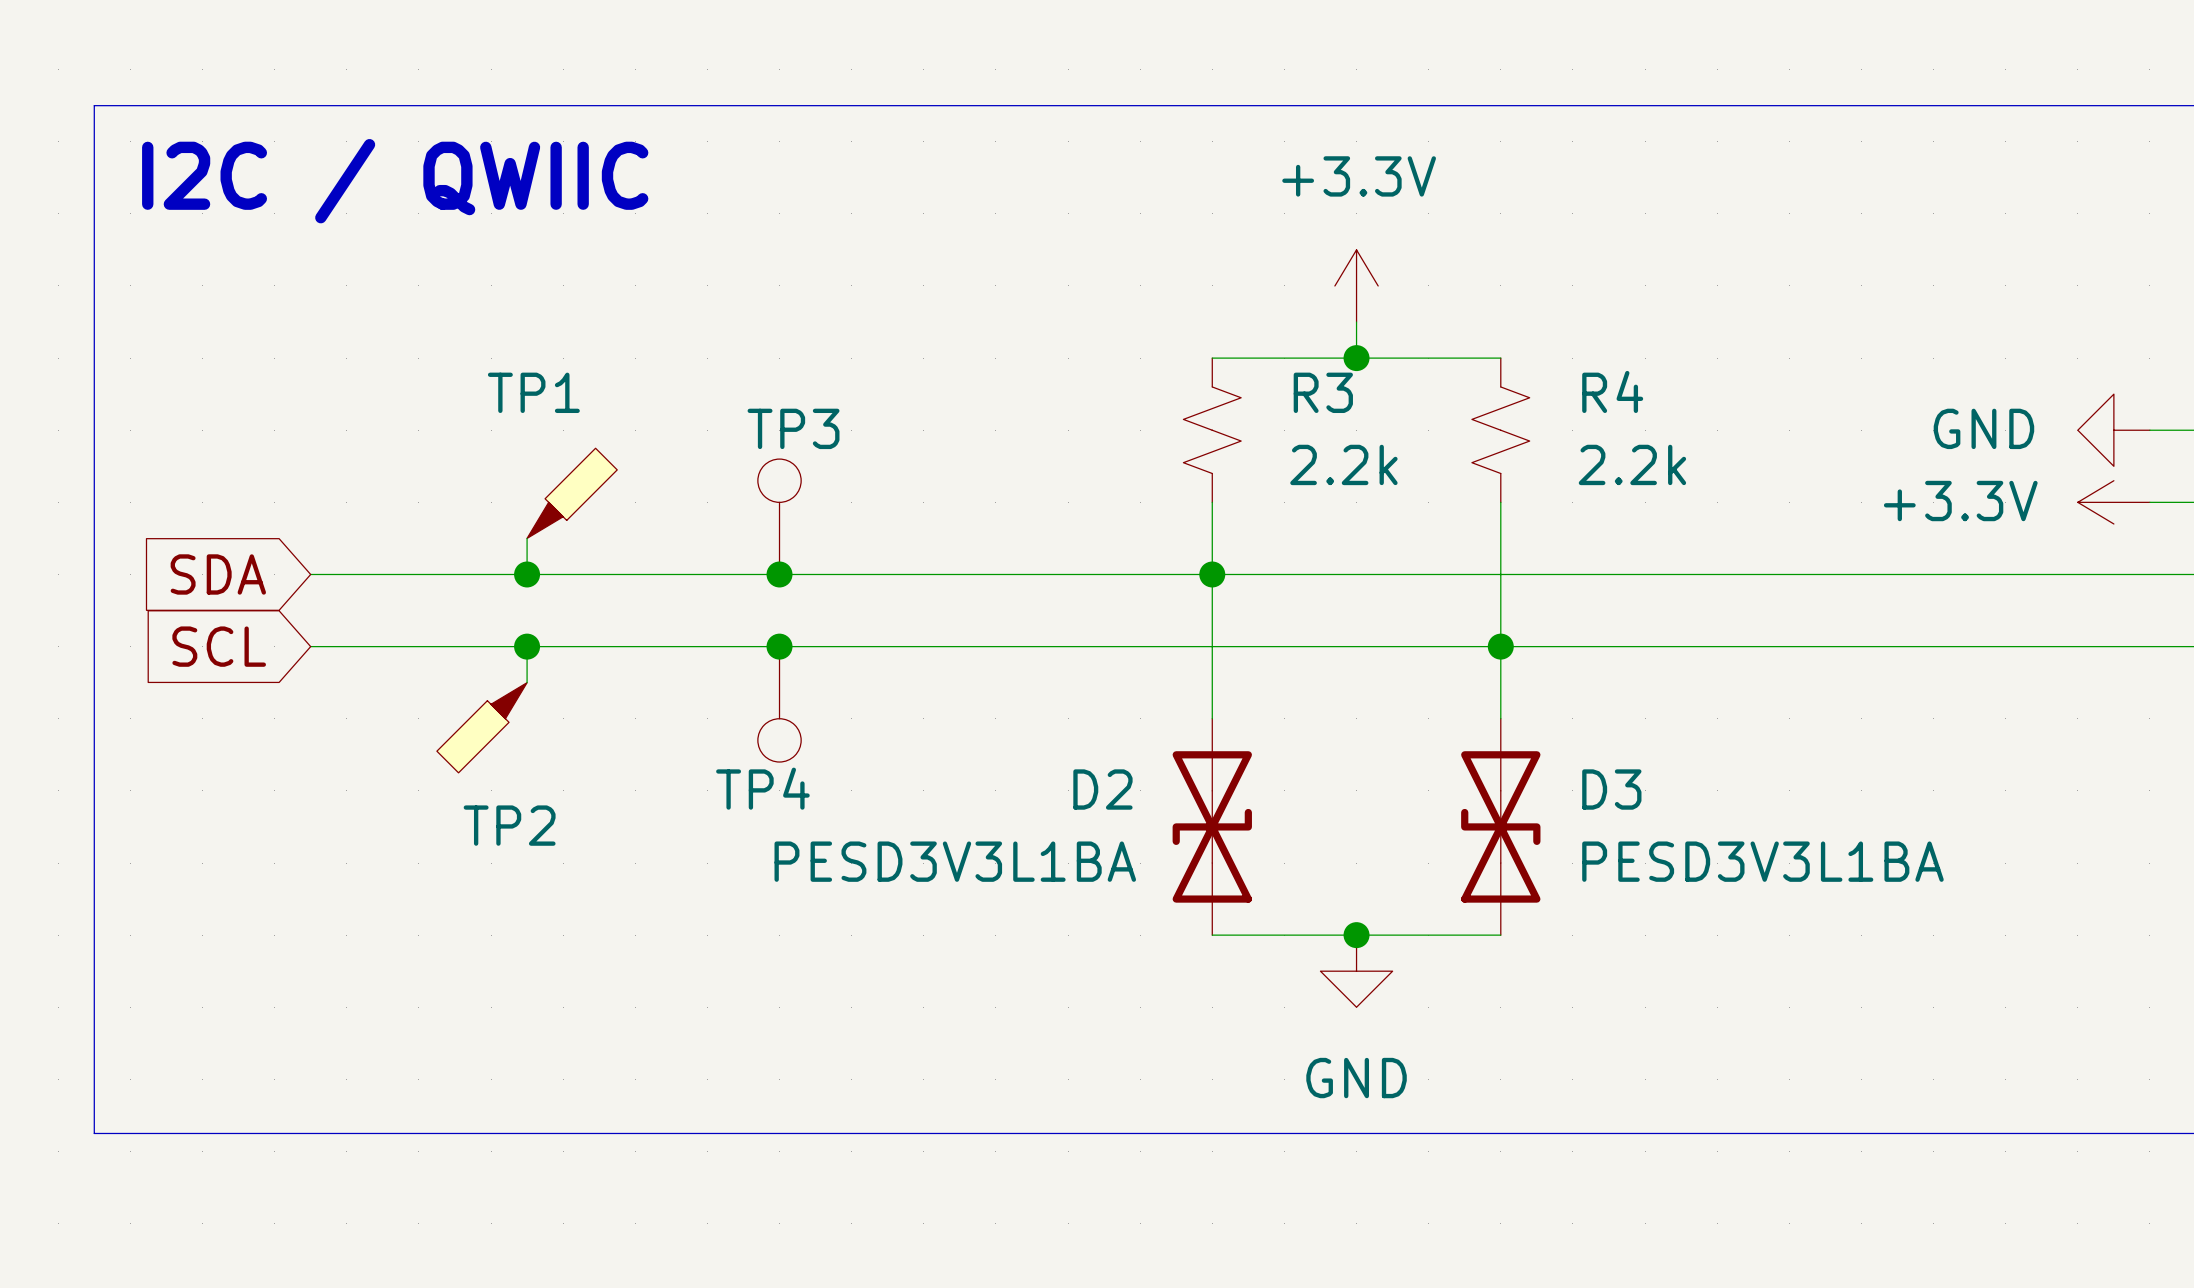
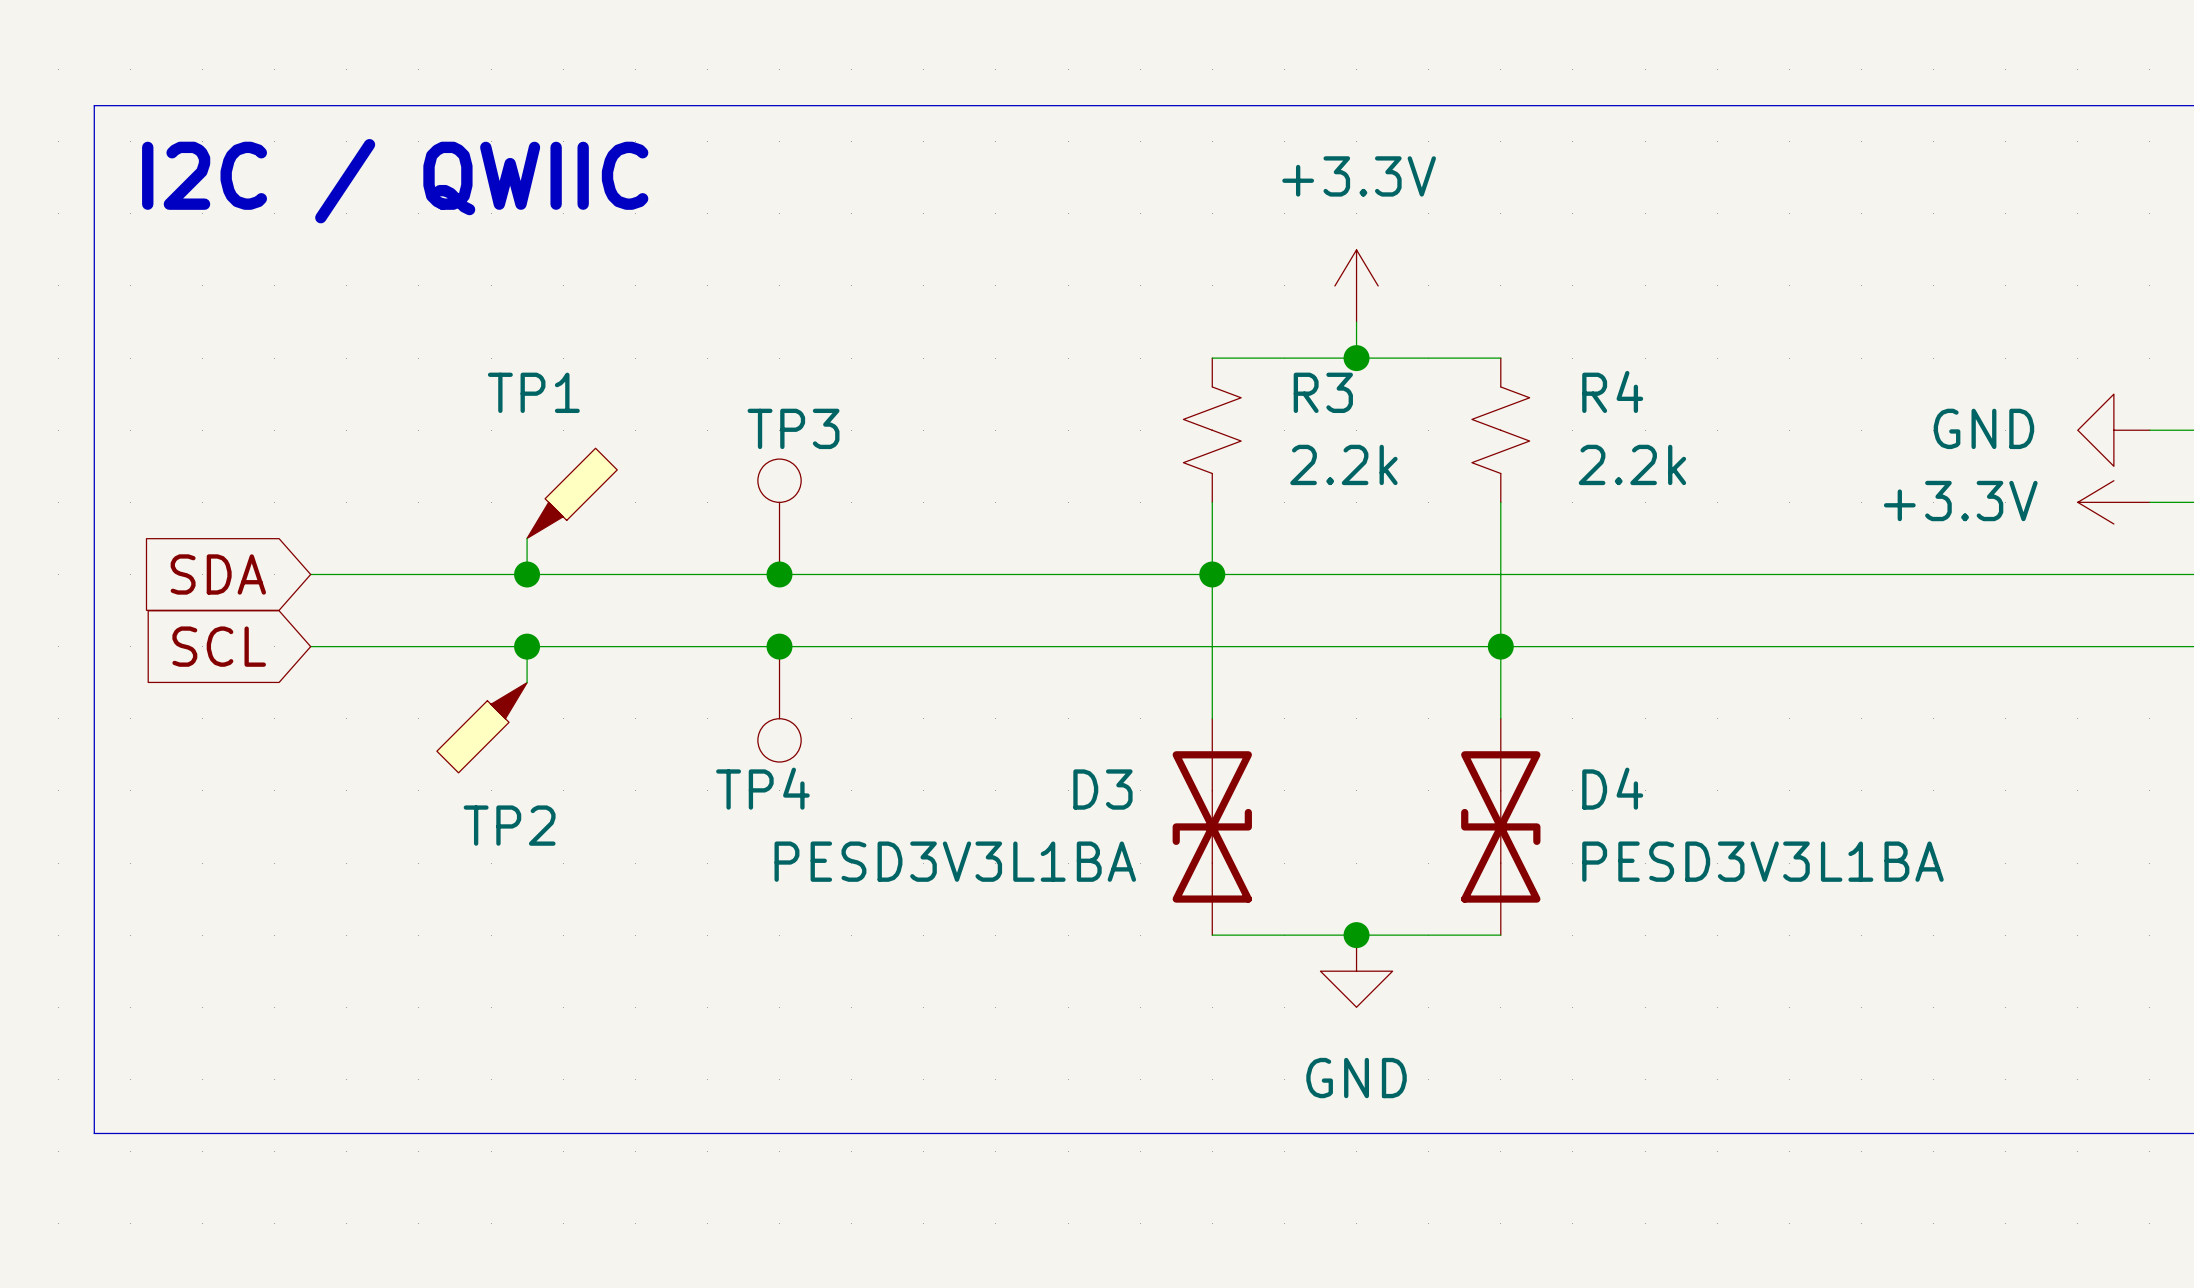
D2 name: D2 (1102, 789) -> D3 (1102, 789)
D3 name: D3 (1611, 789) -> D4 (1612, 788)

